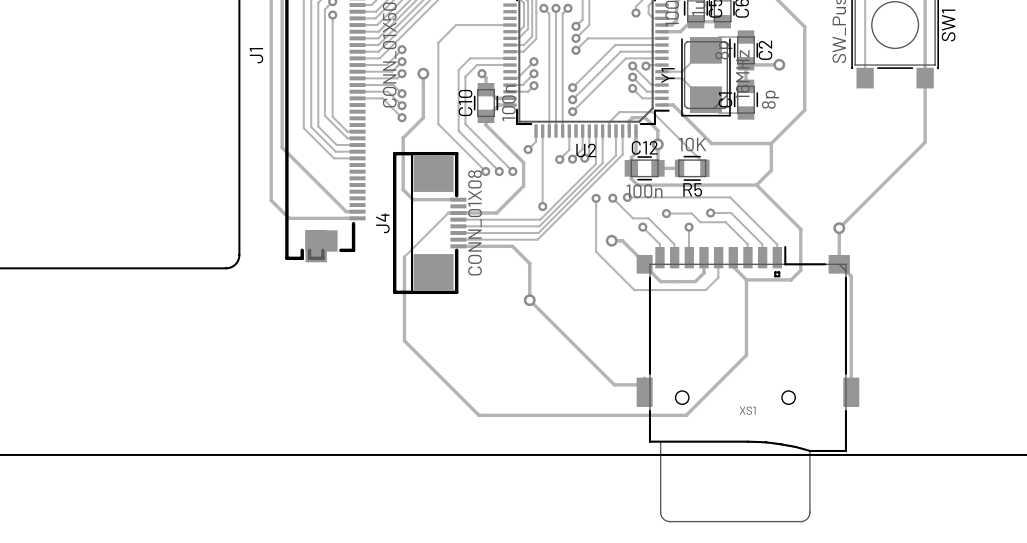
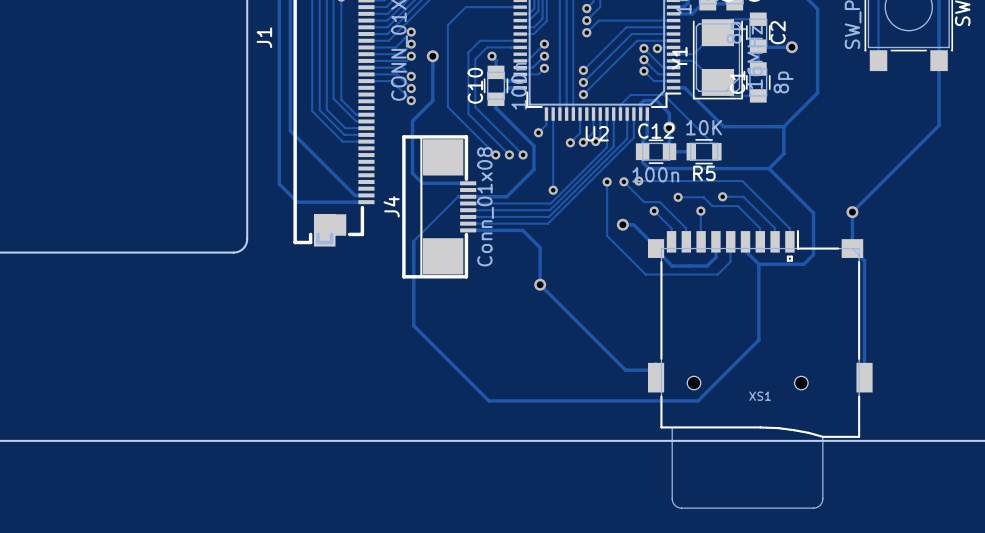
J4 value: CONN_01X08 (474, 222) -> Conn_01x08 (485, 206)

